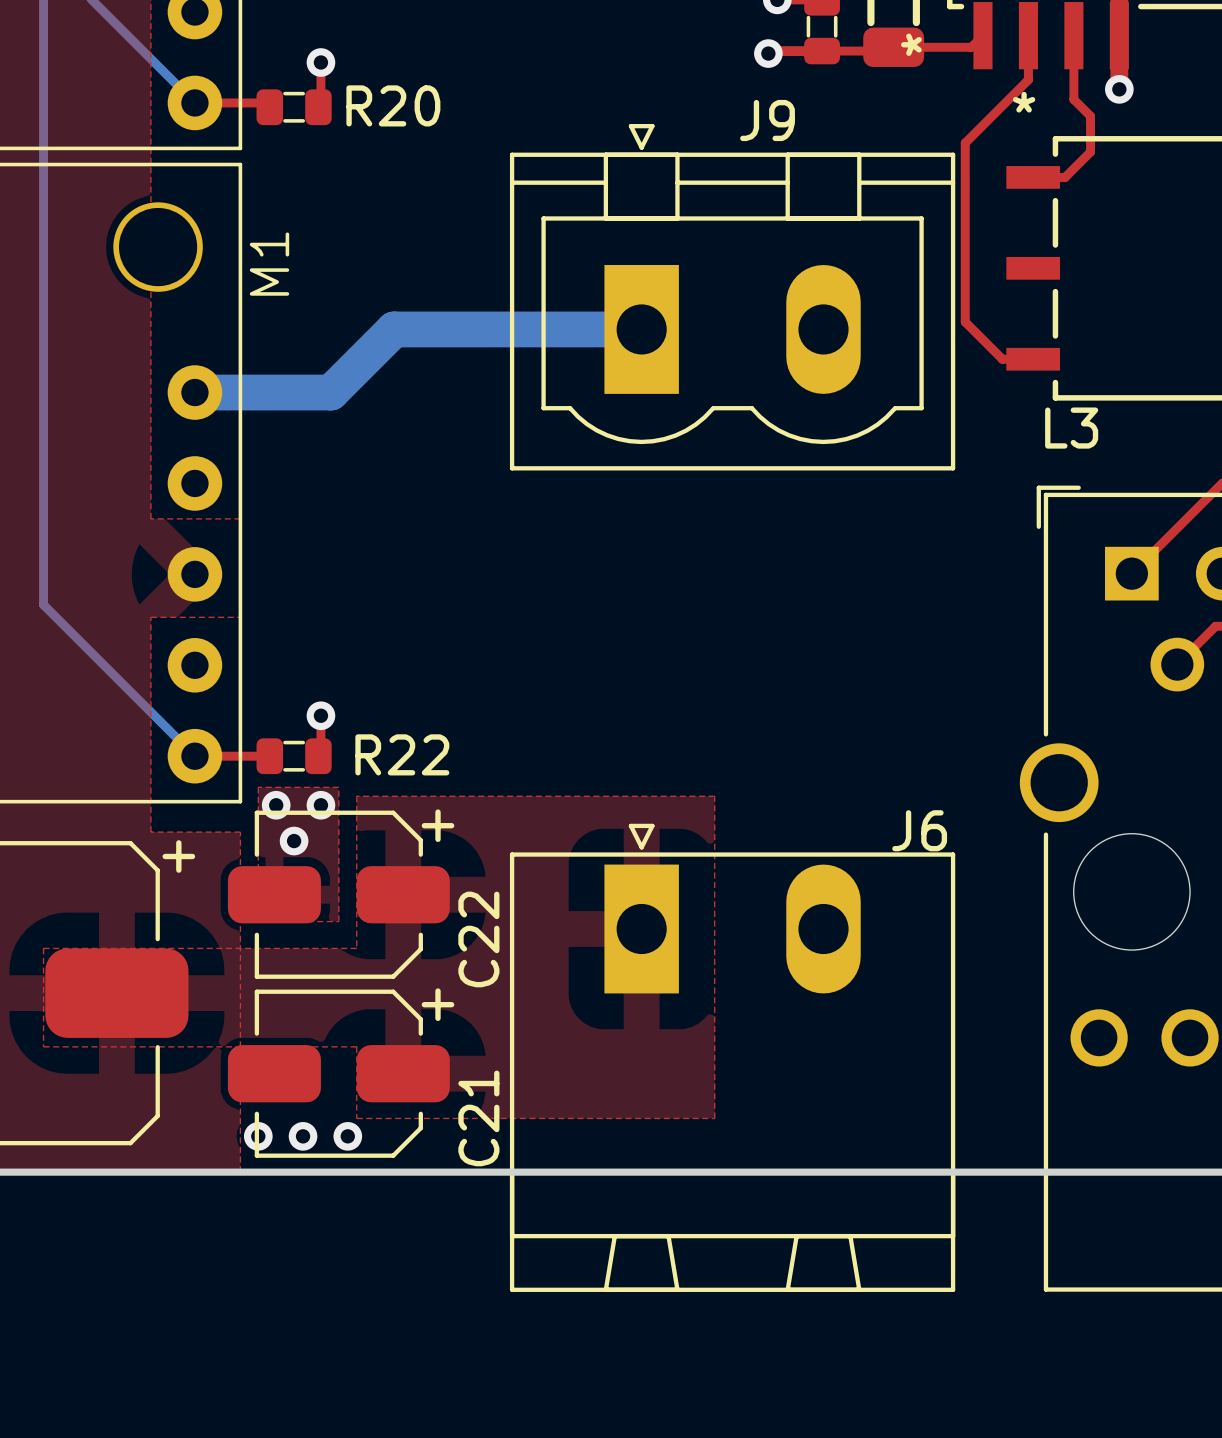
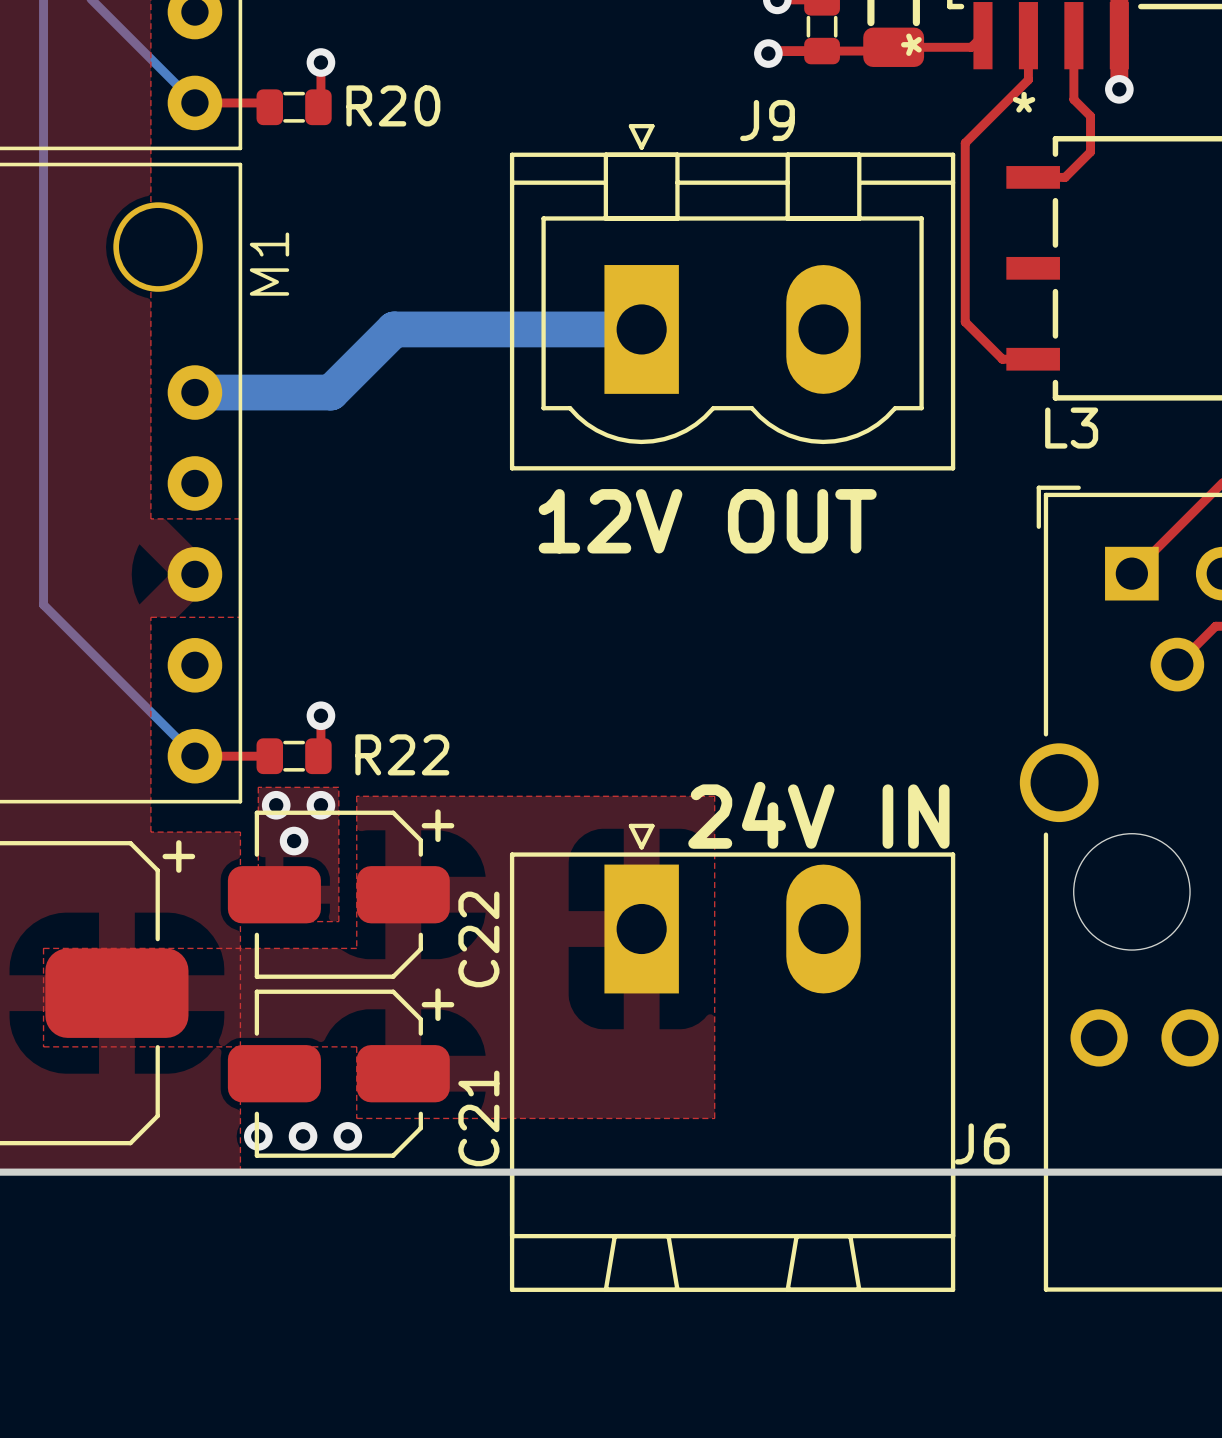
text: none -> 12V OUT (707, 521)
text: none -> 24V IN (818, 815)
J6 name position: J6 (919, 830) -> J6 (982, 1143)

